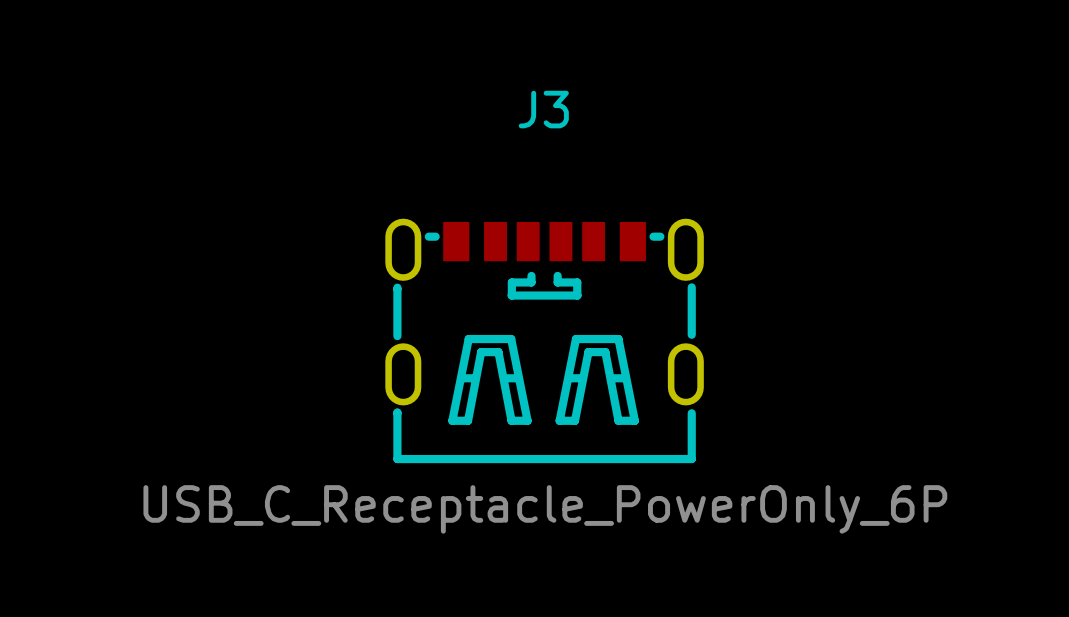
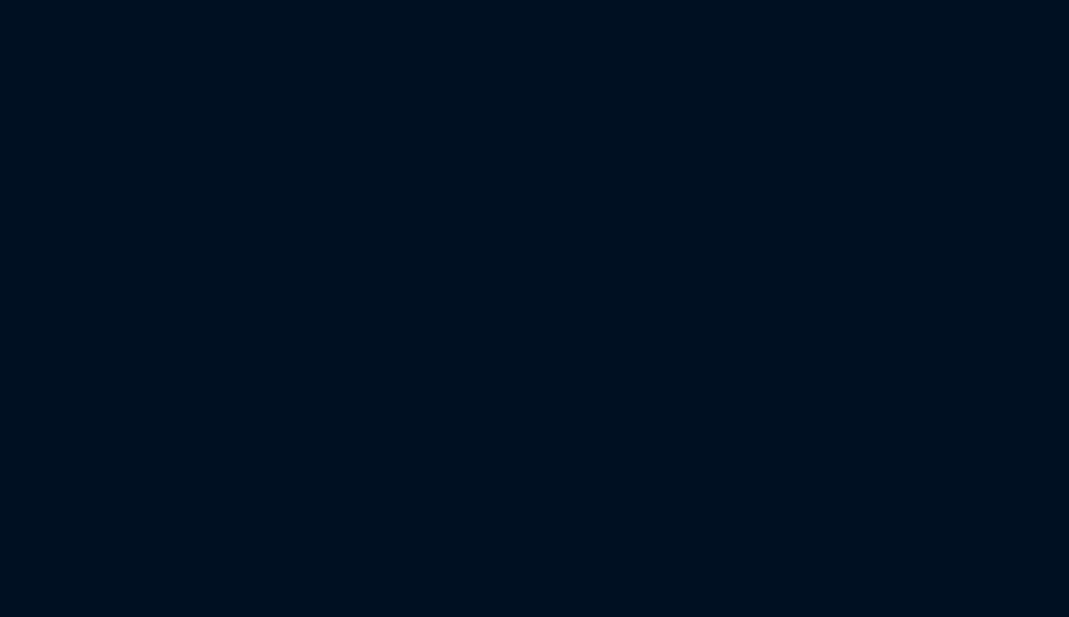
J3: USB_C_Receptacle_PowerOnly_6P (544, 340) -> none

